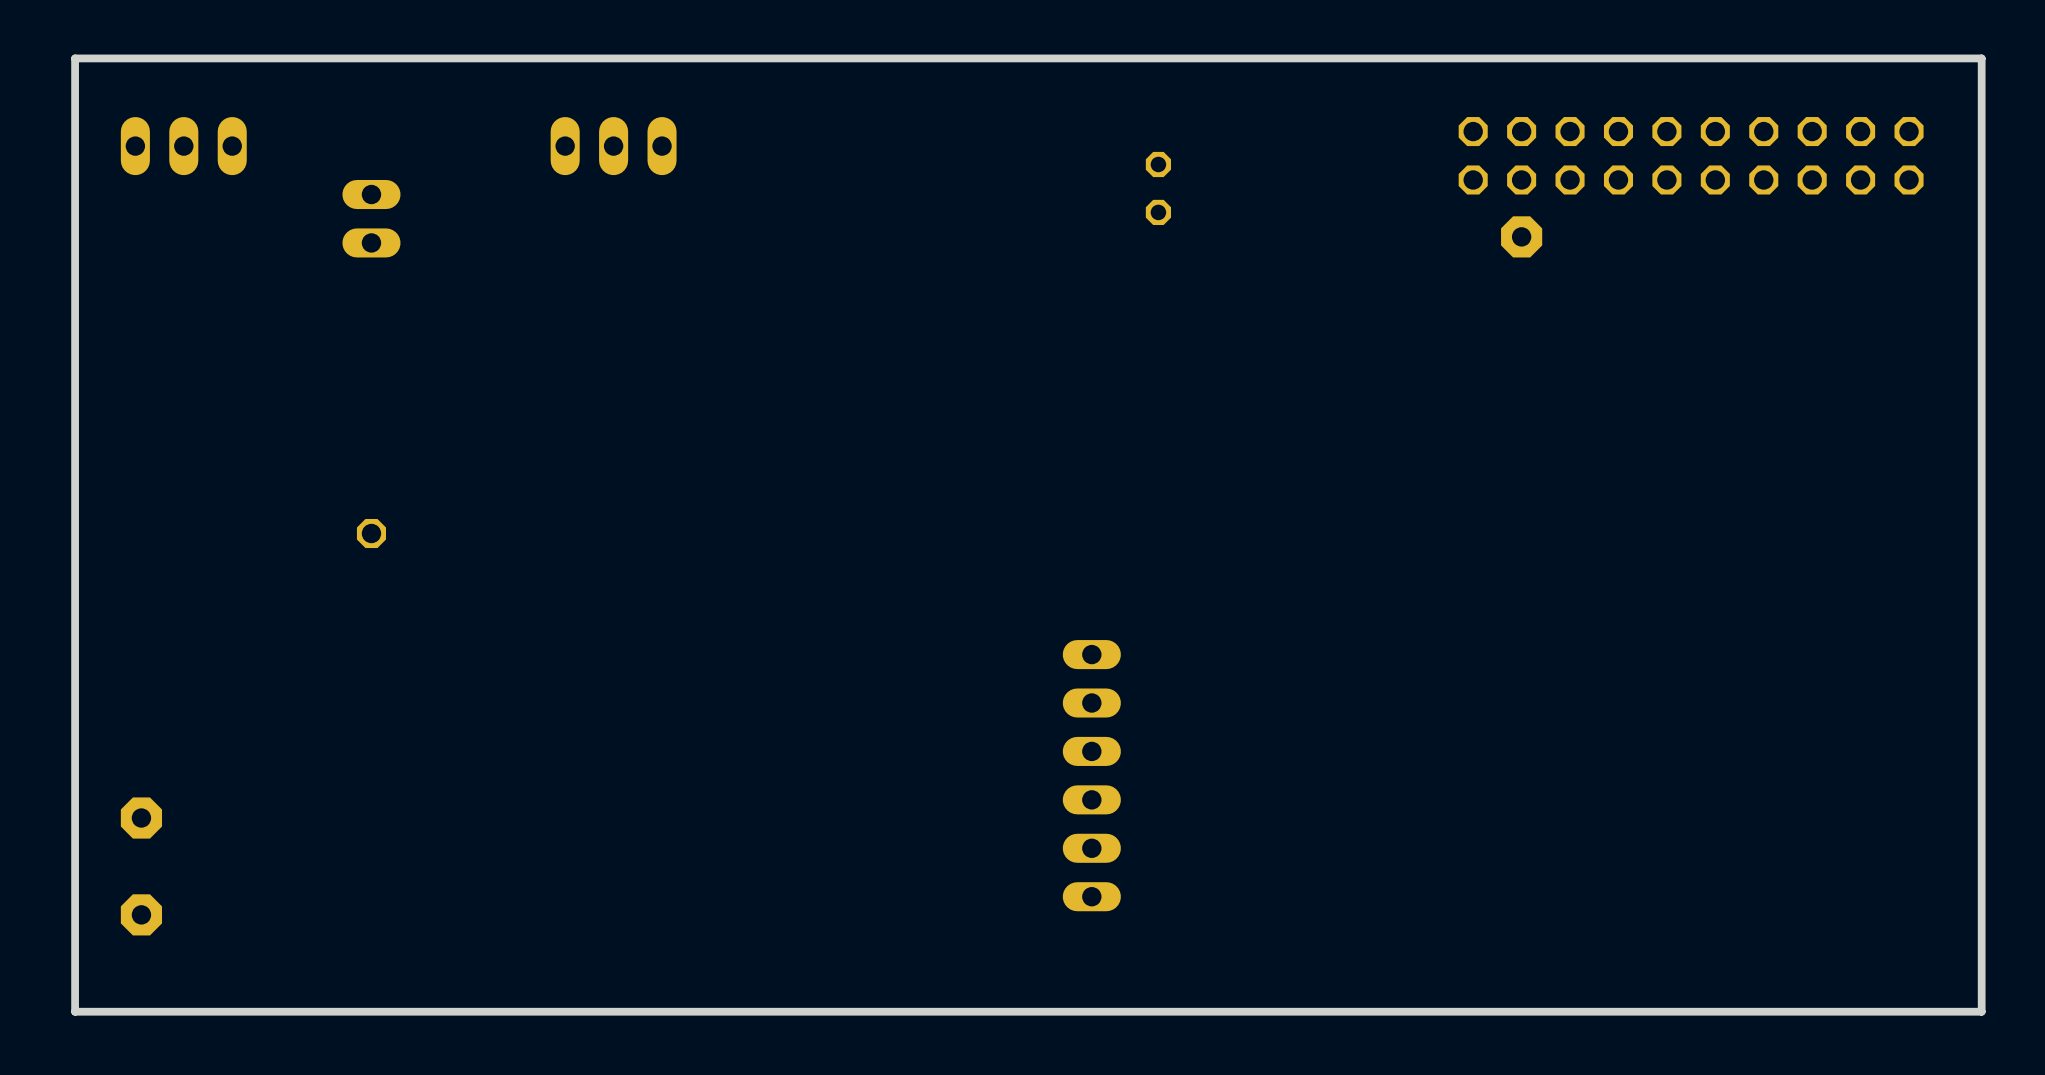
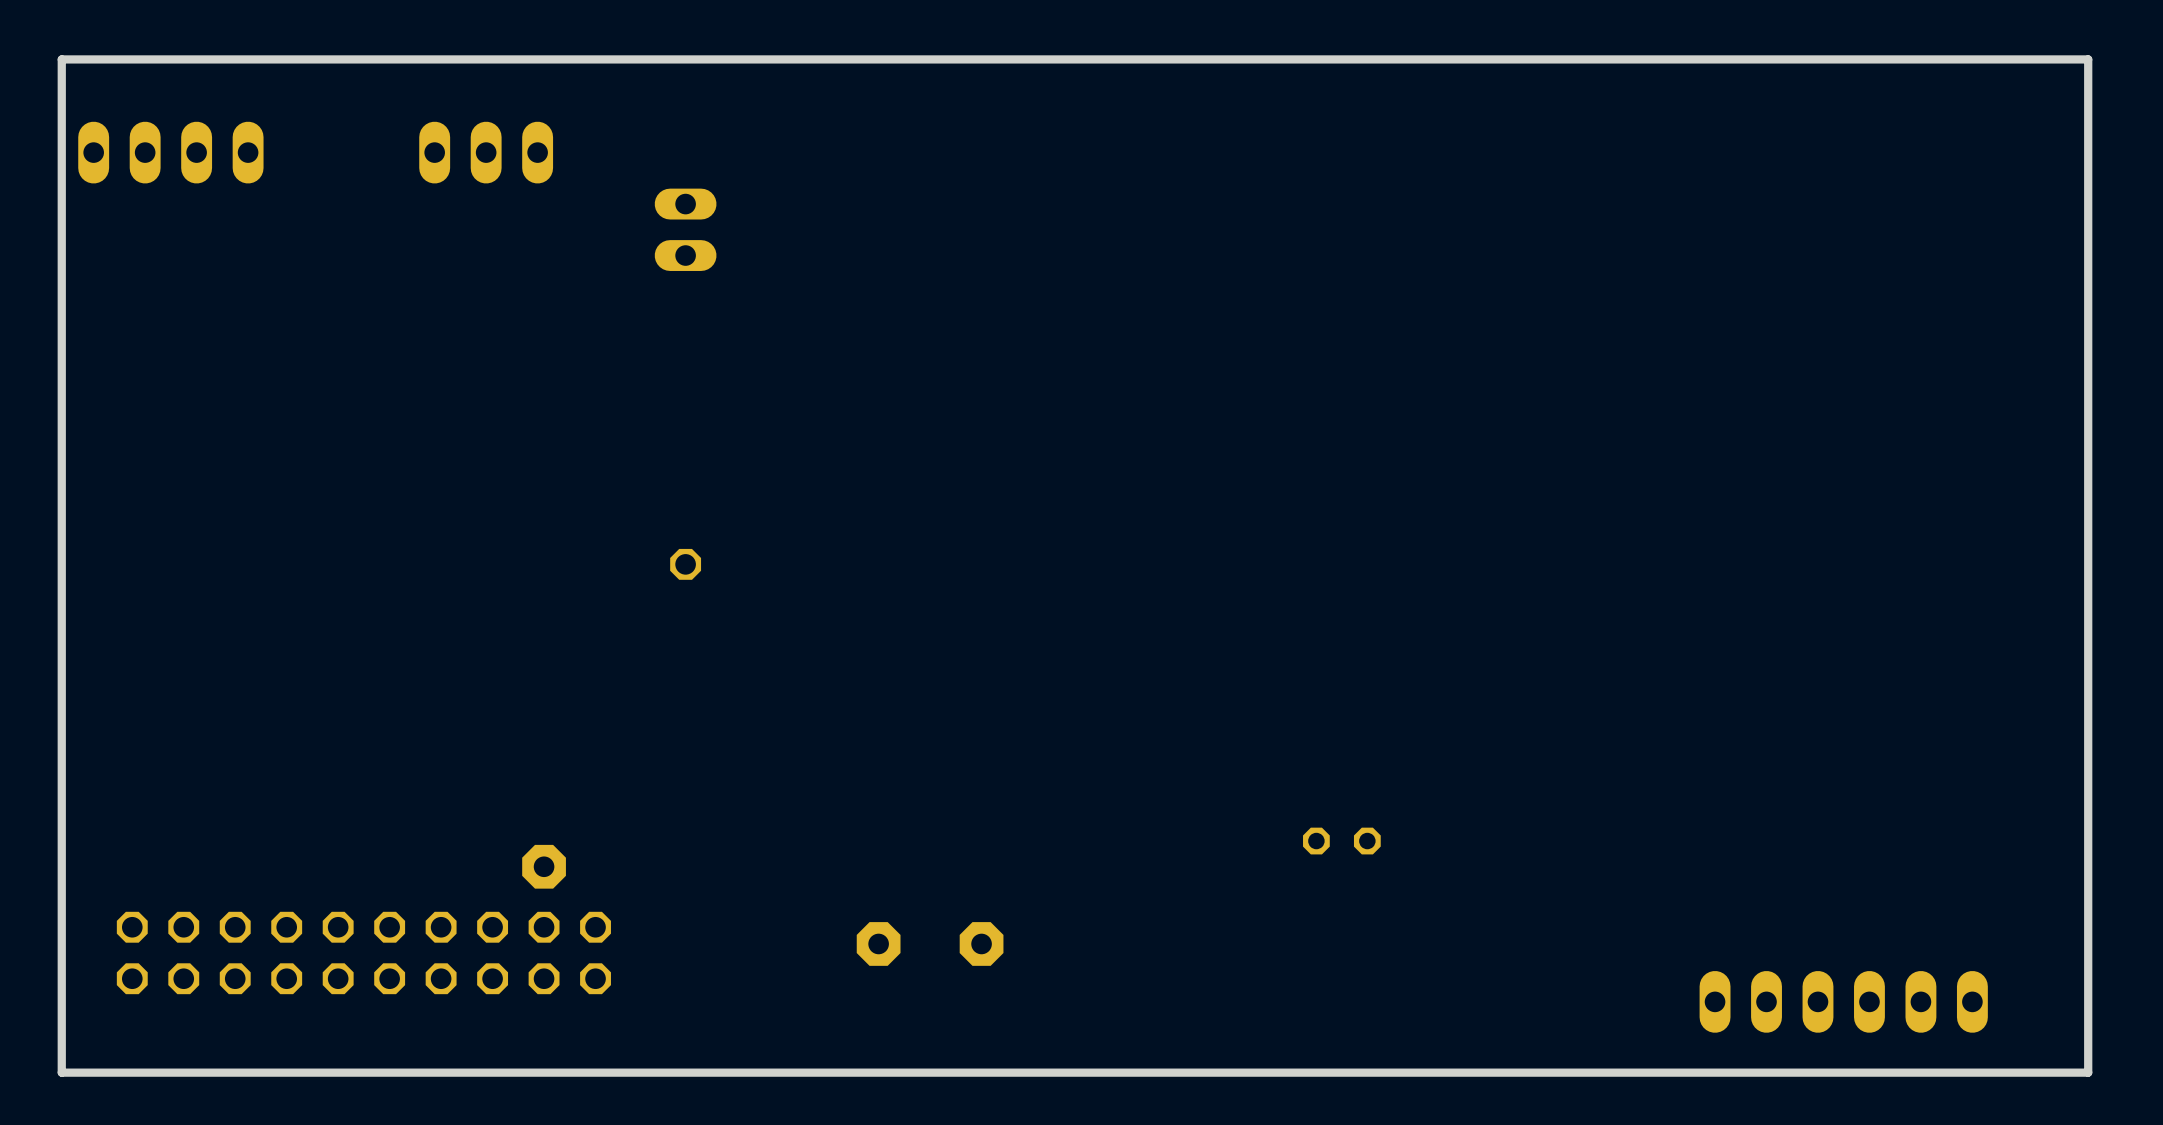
part footprint: [120, 117, 247, 176] -> [78, 121, 264, 184]
part position: (613, 146) -> (486, 152)
part: (1691, 155) -> none
part: (1158, 188) -> none
part position: (371, 218) -> (685, 229)
part: (1521, 236) -> none
part position: (371, 533) -> (685, 564)
part: (1091, 775) -> none
part: none -> (1341, 841)
part: (141, 818) -> none
part: none -> (544, 866)
part: none -> (878, 943)
part: none -> (981, 943)
part: none -> (363, 952)
part: (141, 914) -> none
part: none -> (1843, 1001)

